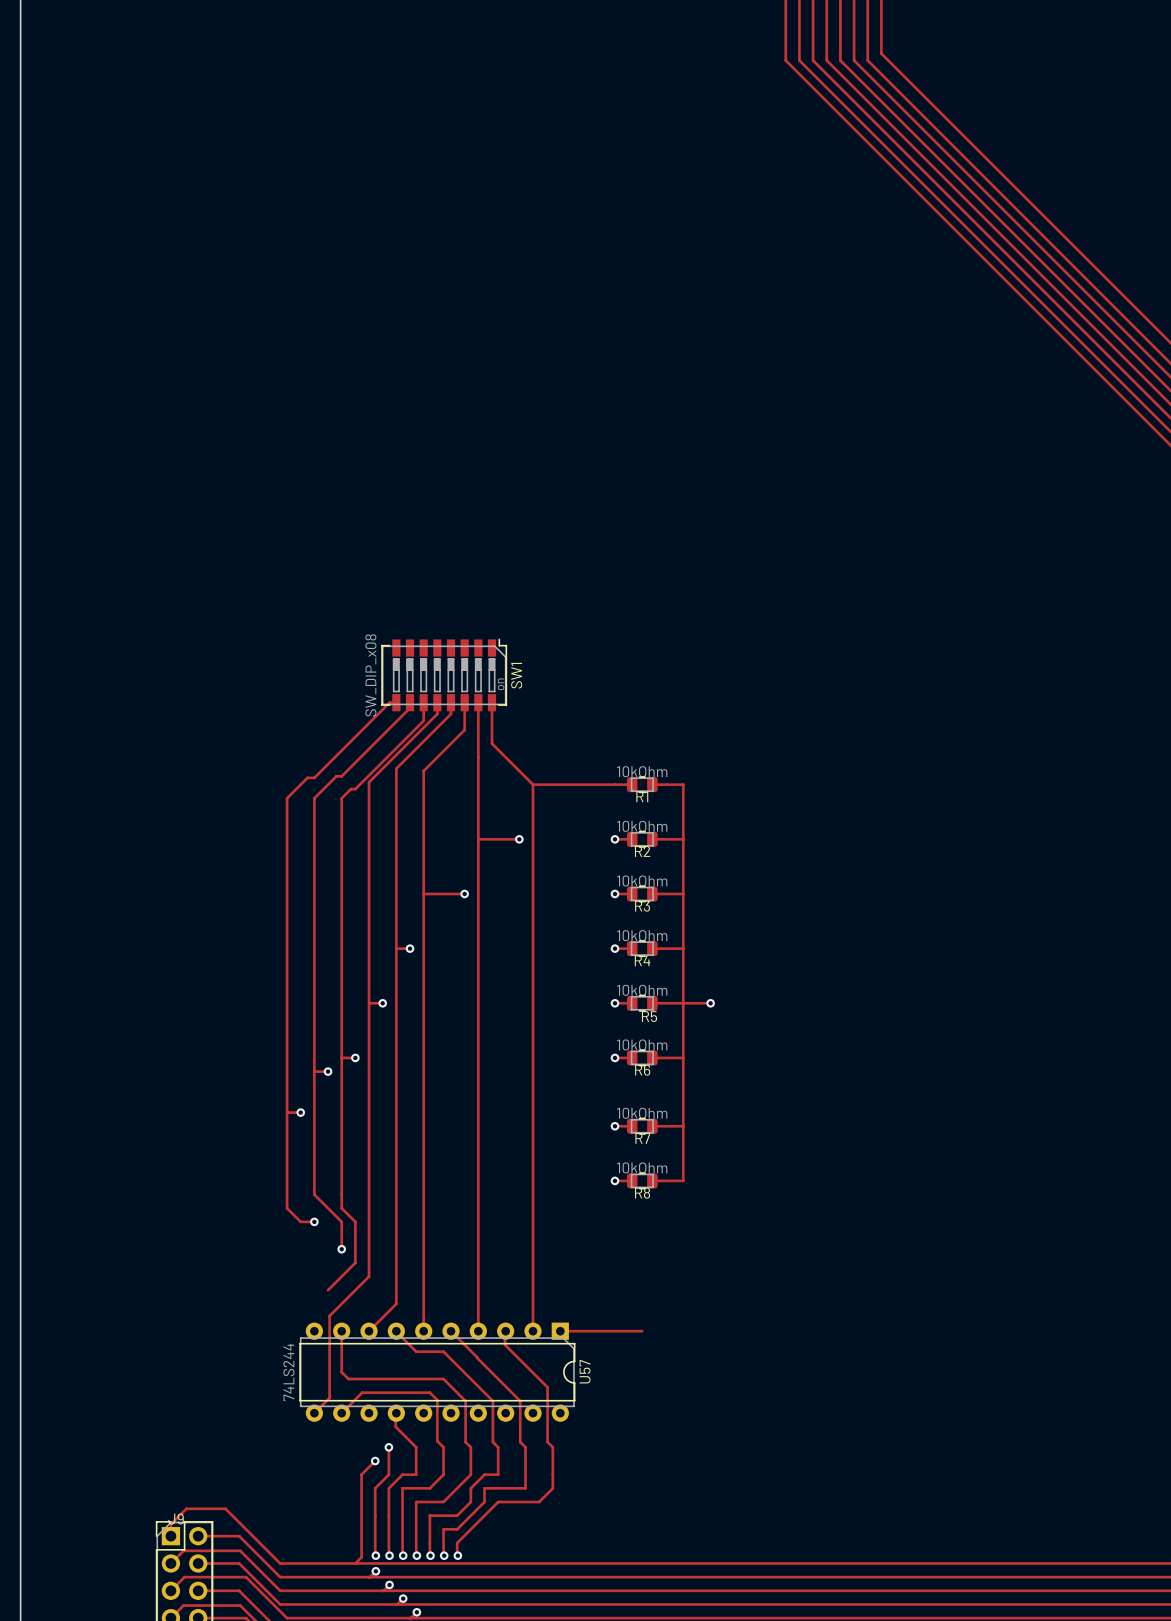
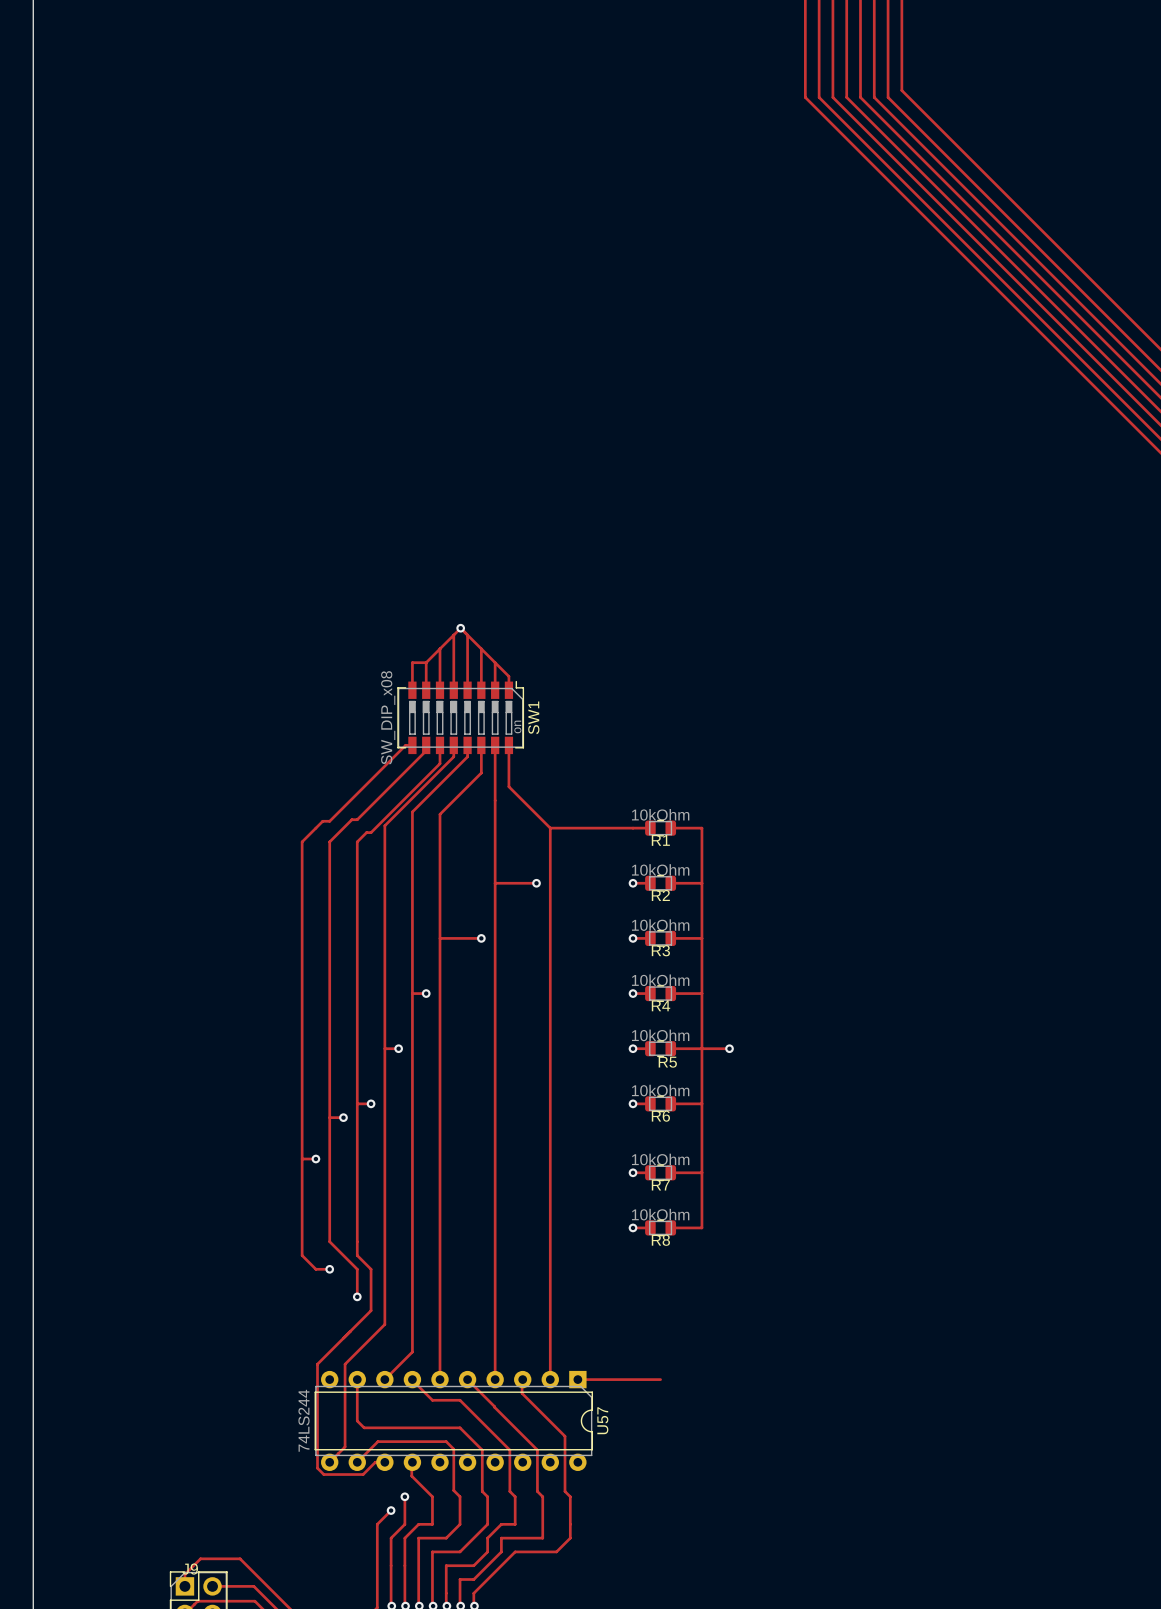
via: none -> (460, 628)
track: none -> (453, 635) (453, 690)
track: none -> (467, 635) (467, 690)
track: none -> (440, 648) (440, 690)
track: none -> (481, 648) (481, 690)
track: none -> (426, 662) (412, 662) (412, 690)
track: none -> (426, 662) (460, 628) (508, 676) (508, 690)
track: none -> (426, 662) (426, 690)
track: none -> (495, 662) (495, 690)
track: none -> (343, 1338) (317, 1364) (317, 1468) (323, 1474) (363, 1474) (375, 1462) (384, 1462)

